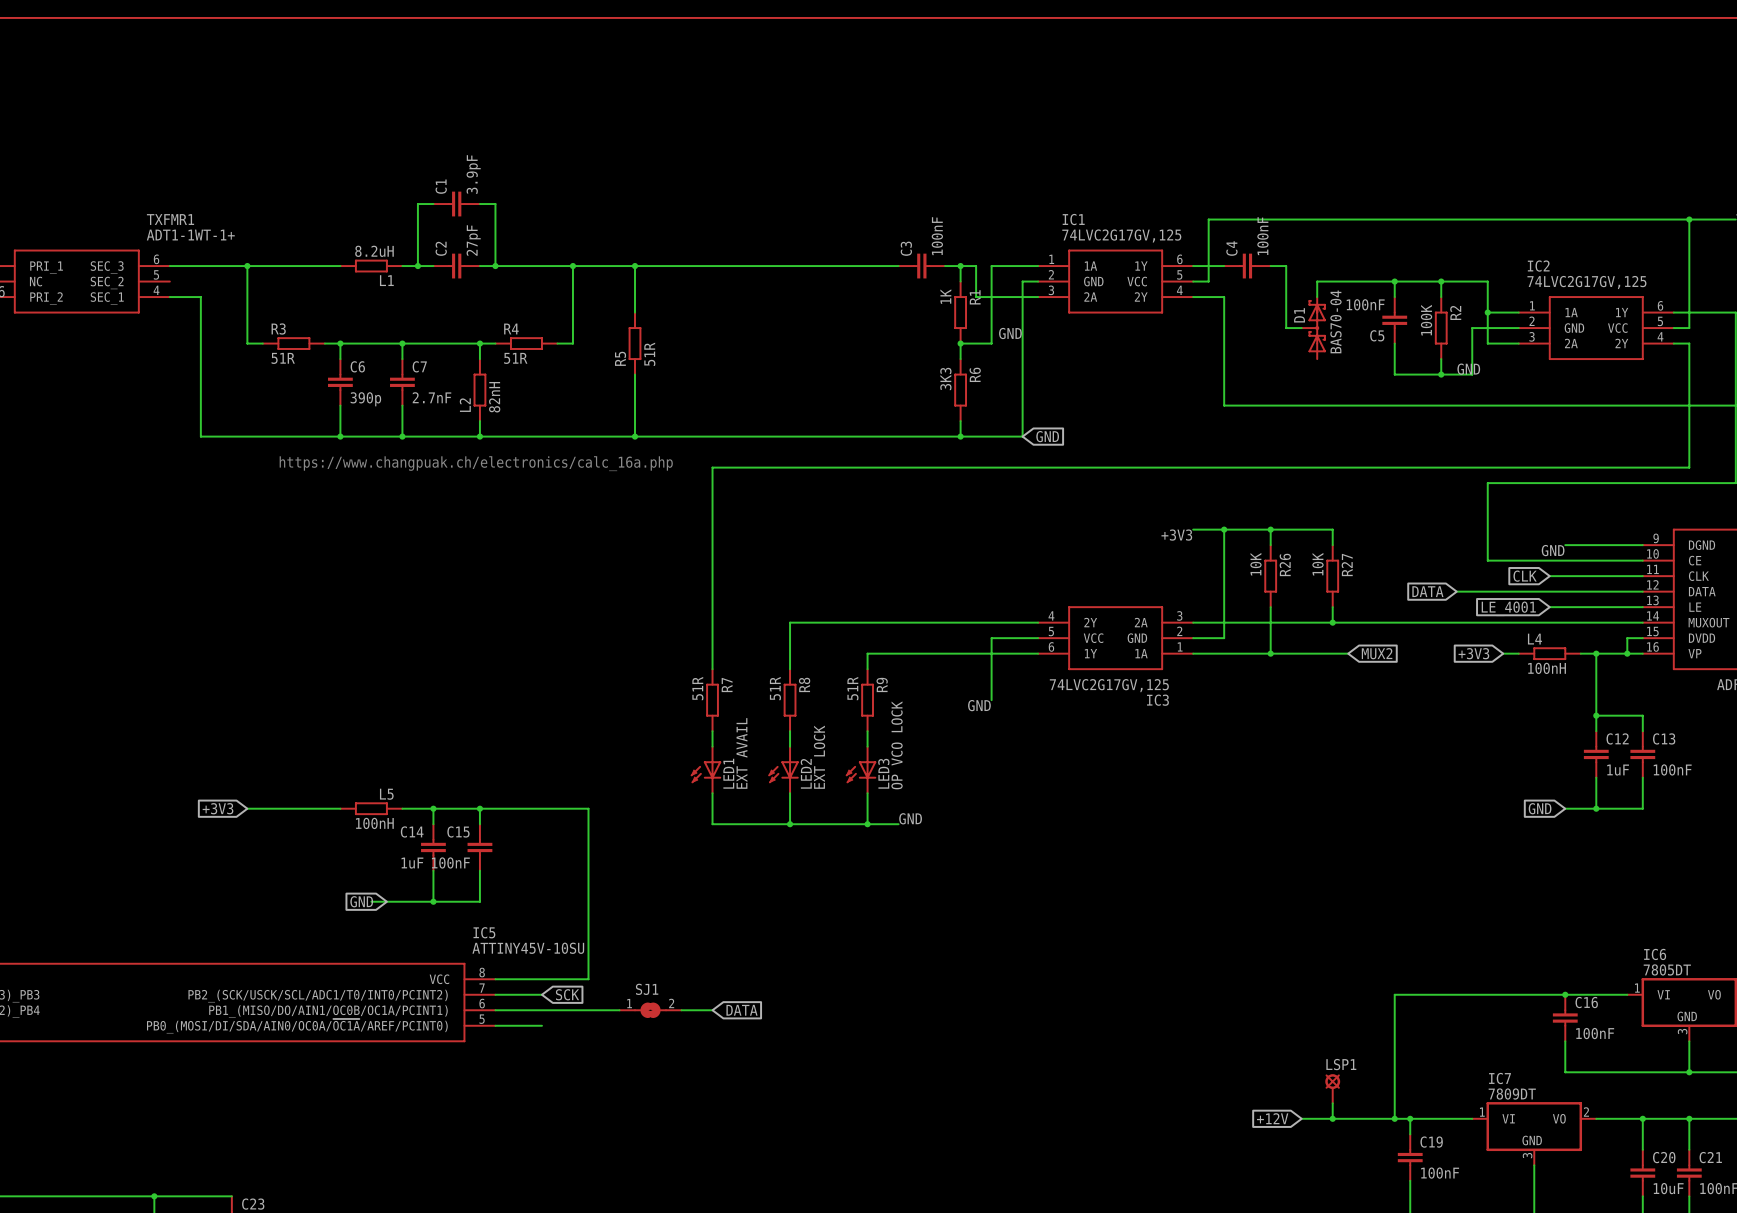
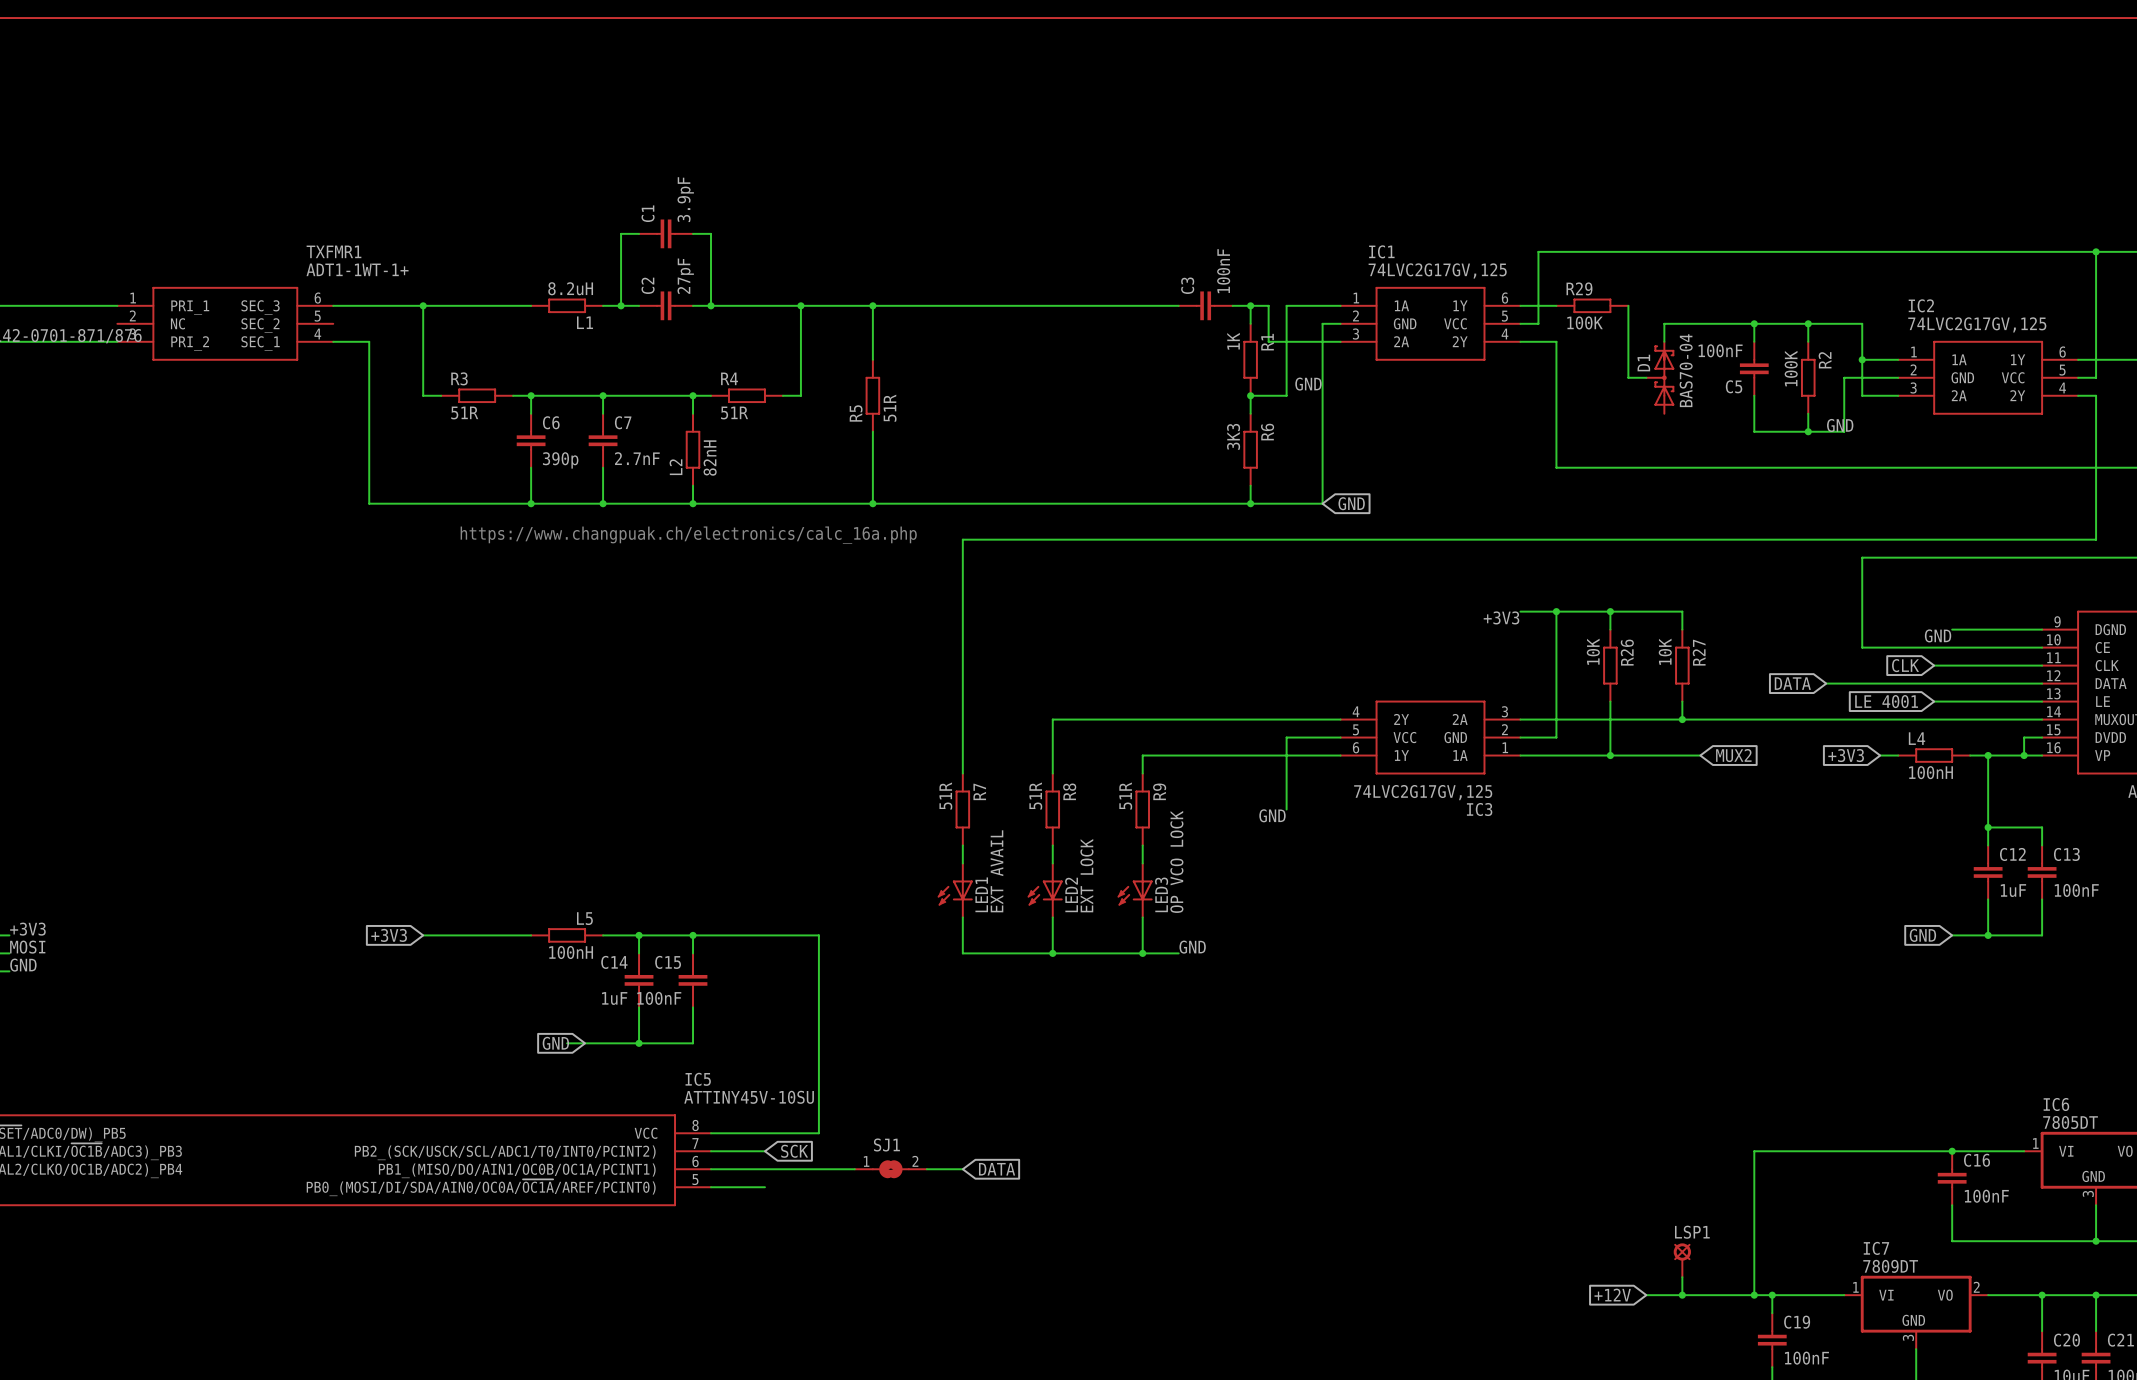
C4: 100nF (1247, 266) -> none
R29: none -> 100K (1592, 305)

